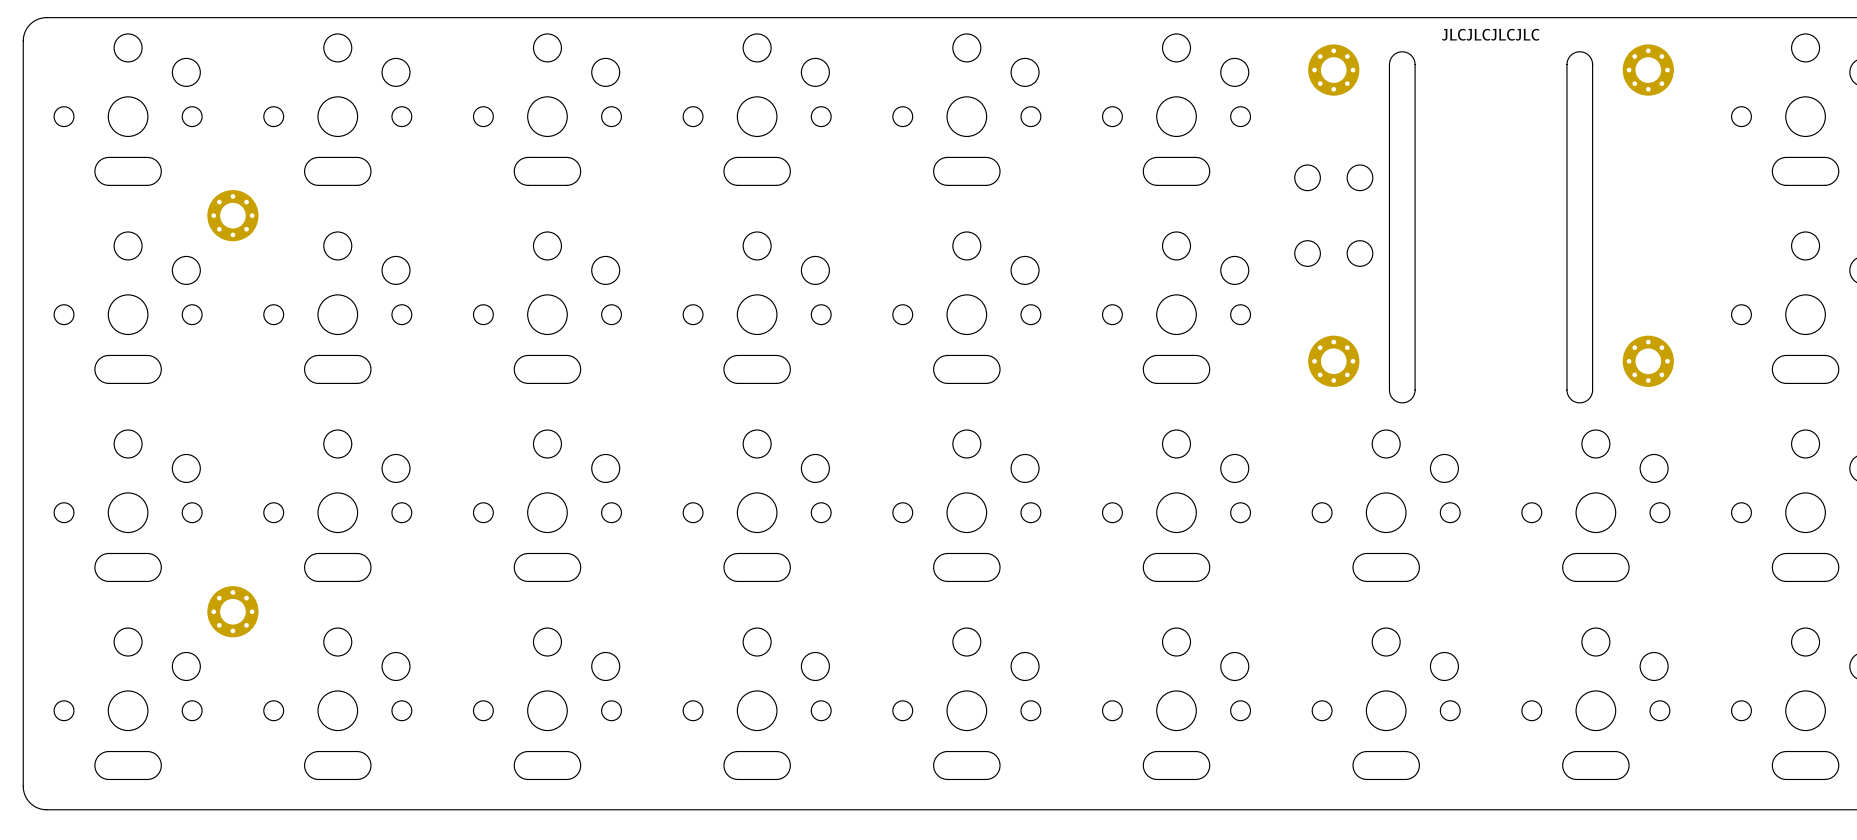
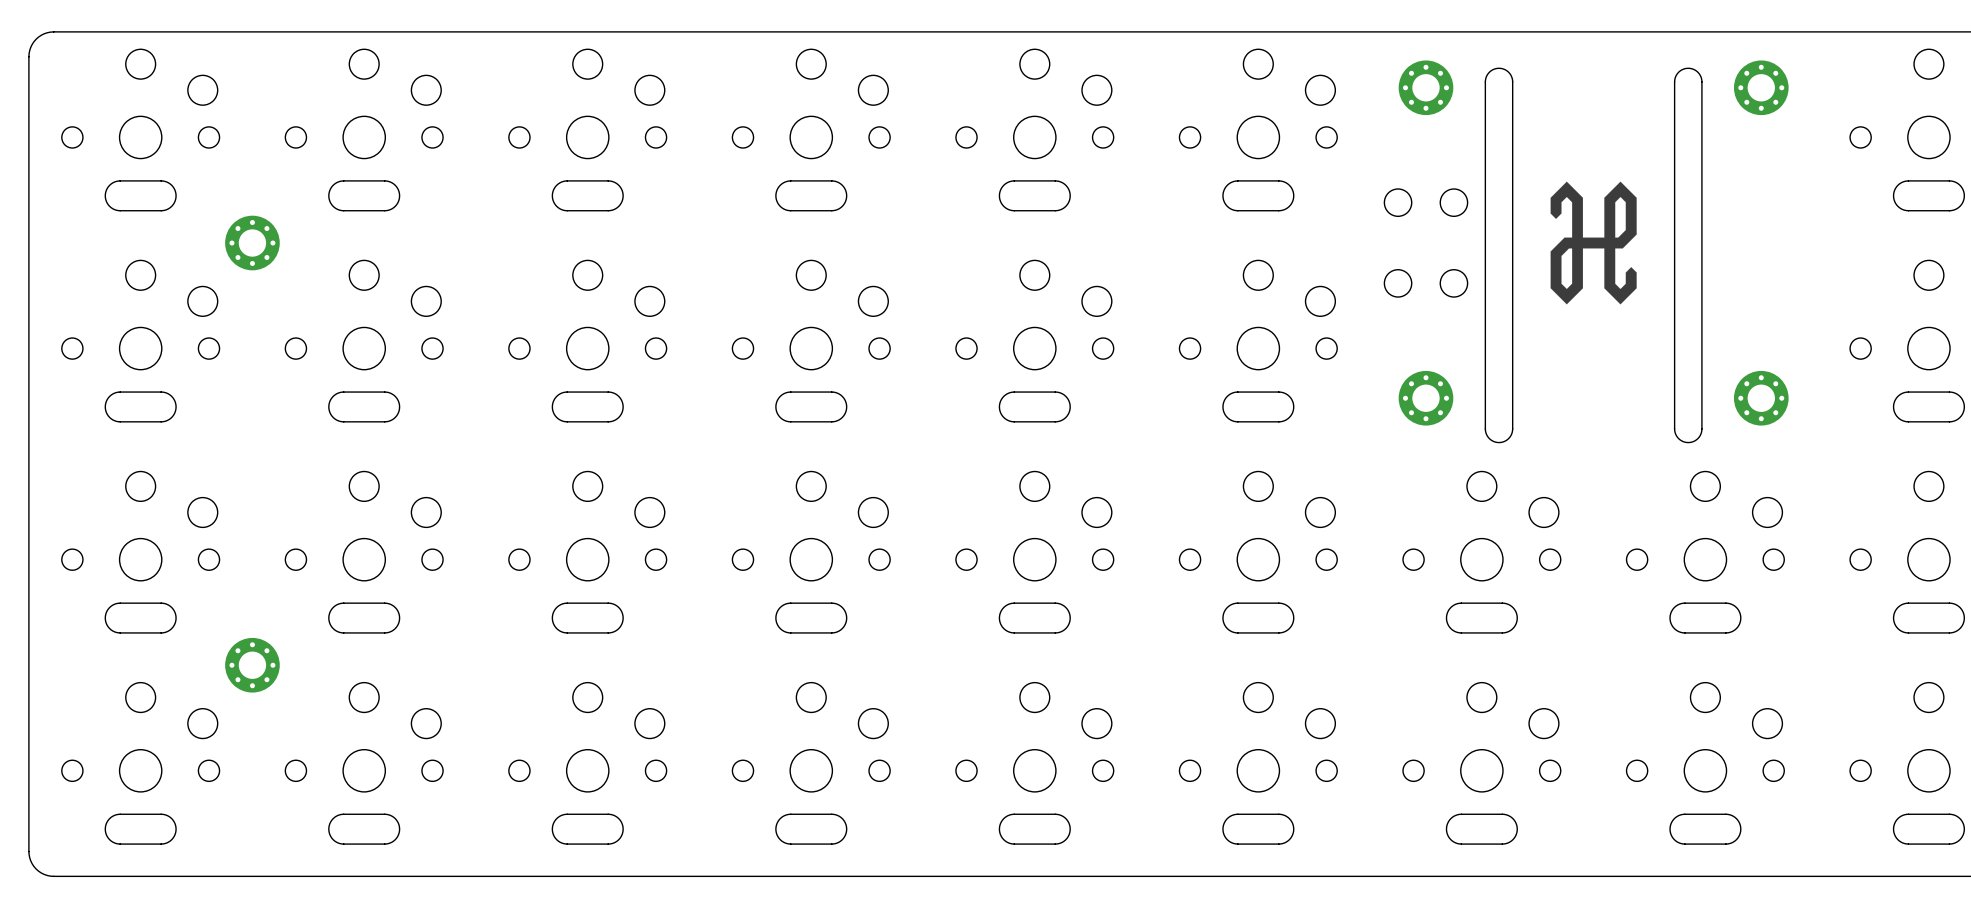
text: JLCJLCJLCJLC (1490, 34) -> none
drawing: none -> [1550, 181, 1637, 305]

